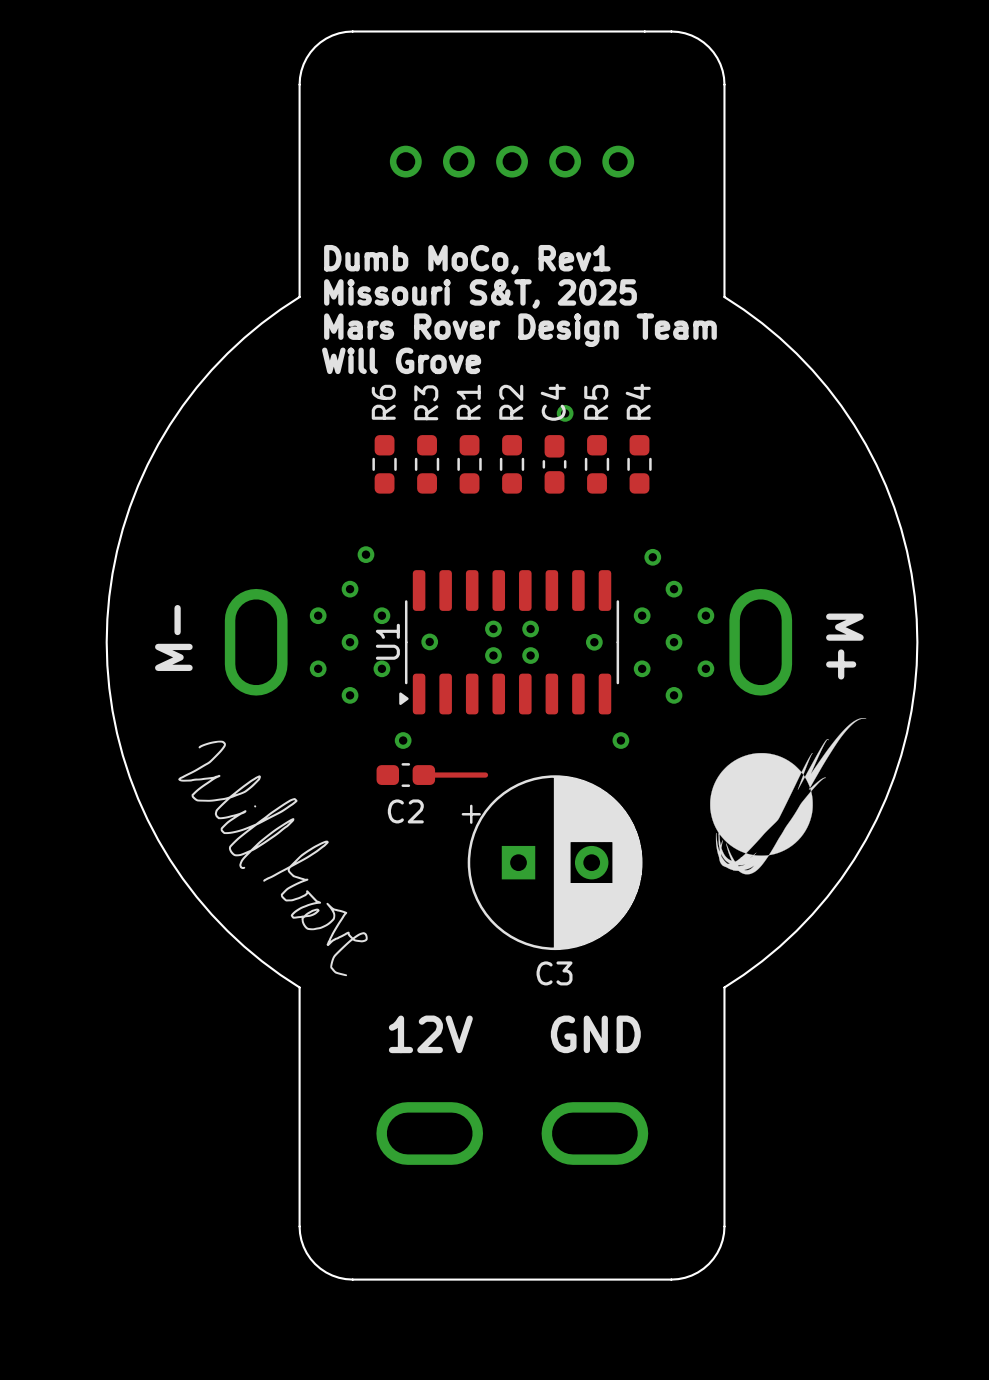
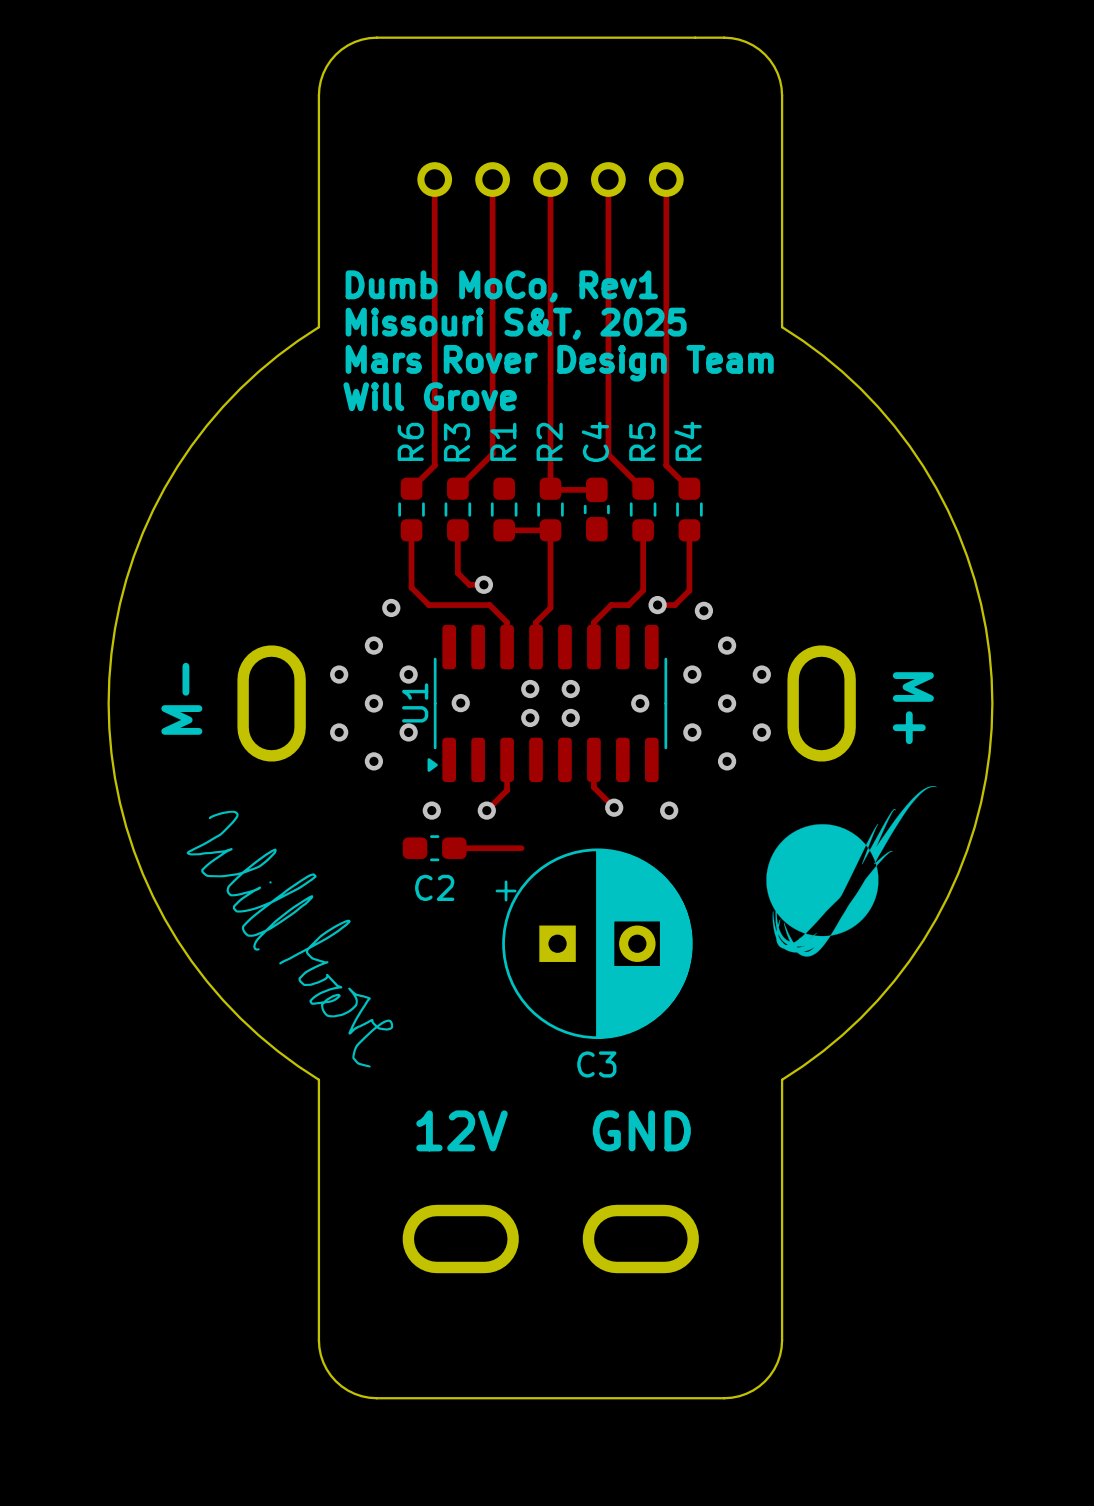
track: none -> (434, 179) (434, 465) (411, 488)
track: none -> (492, 179) (492, 453) (457, 488)
track: none -> (550, 179) (550, 488) (596, 489)
track: none -> (608, 179) (608, 454) (643, 488)
track: none -> (666, 179) (666, 465) (689, 488)
via: (565, 413) -> none
track: none -> (411, 530) (411, 587) (428, 605) (489, 605) (507, 622) (507, 647)
track: none -> (457, 530) (457, 573) (469, 584) (483, 584)
track: none -> (504, 530) (550, 530) (550, 607) (536, 622) (536, 647)
track: none -> (643, 530) (643, 590) (628, 605) (611, 605) (593, 622) (593, 647)
track: none -> (689, 530) (689, 590) (674, 605) (657, 605)
via: none -> (483, 584)
via: none -> (657, 605)
track: none -> (507, 759) (507, 790) (486, 810)
track: none -> (593, 759) (593, 787) (614, 807)
via: none -> (614, 807)
via: none -> (486, 810)

